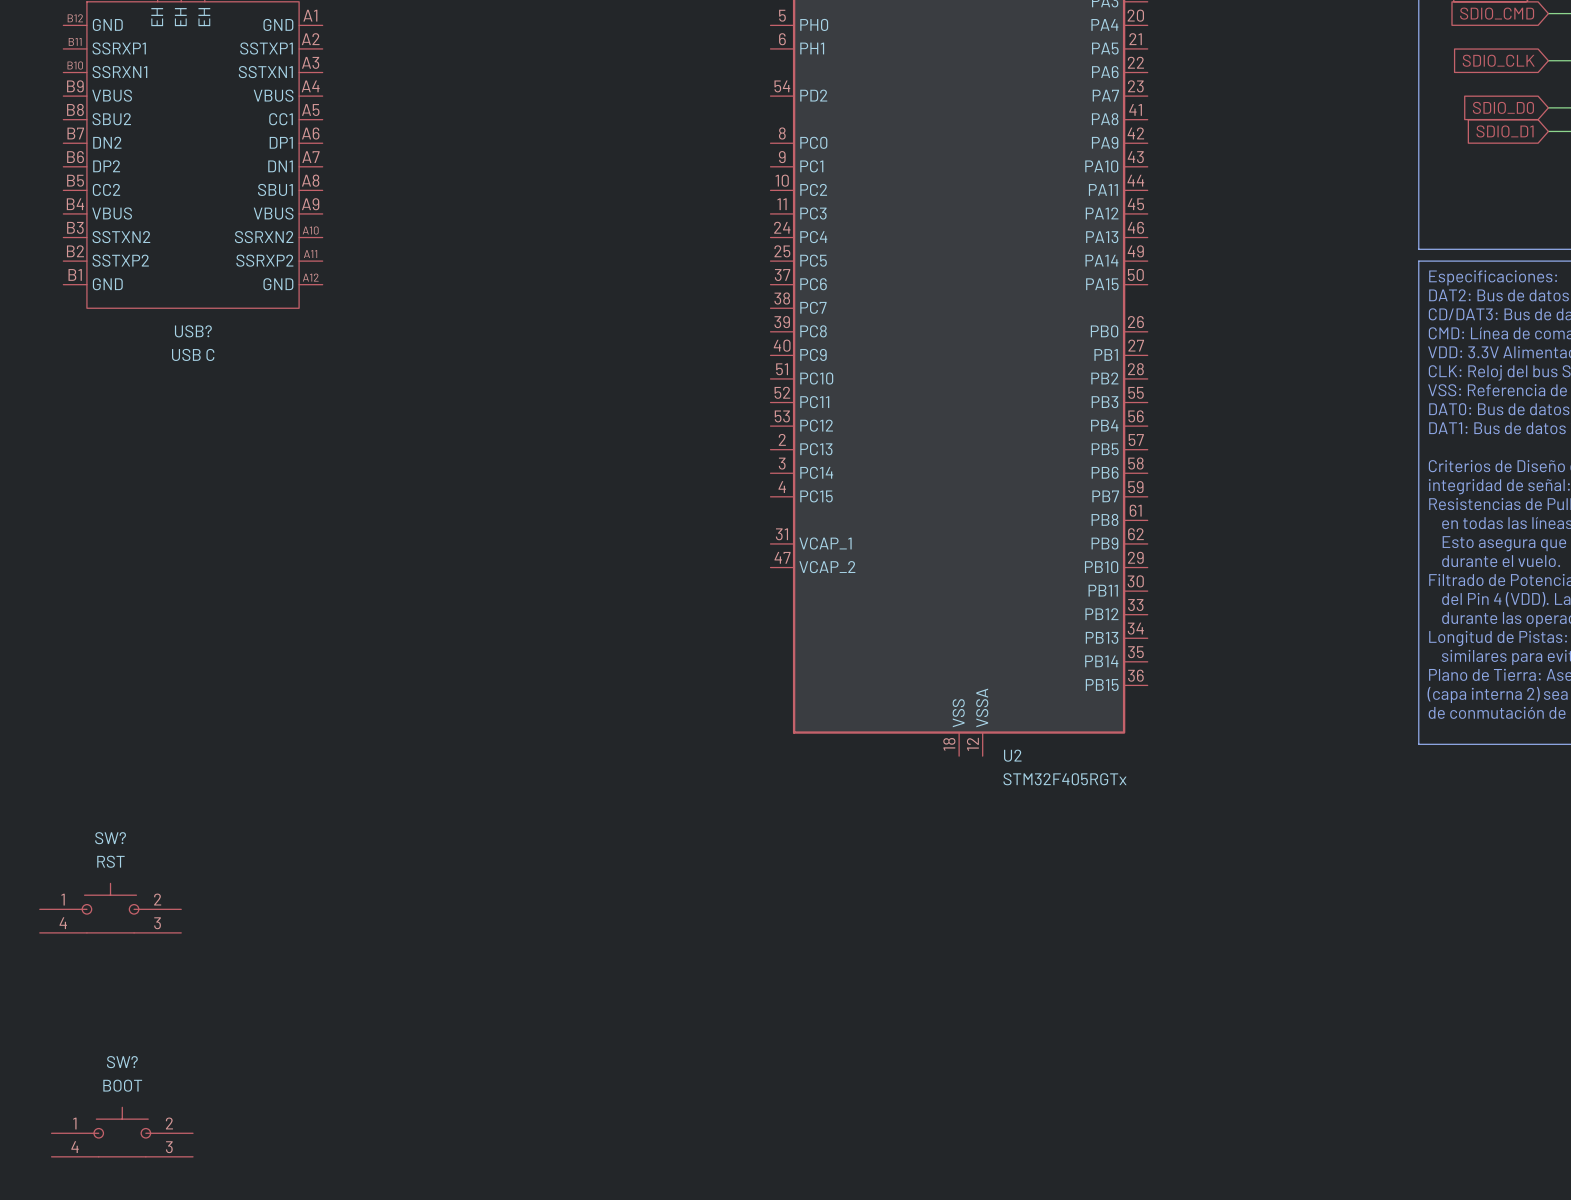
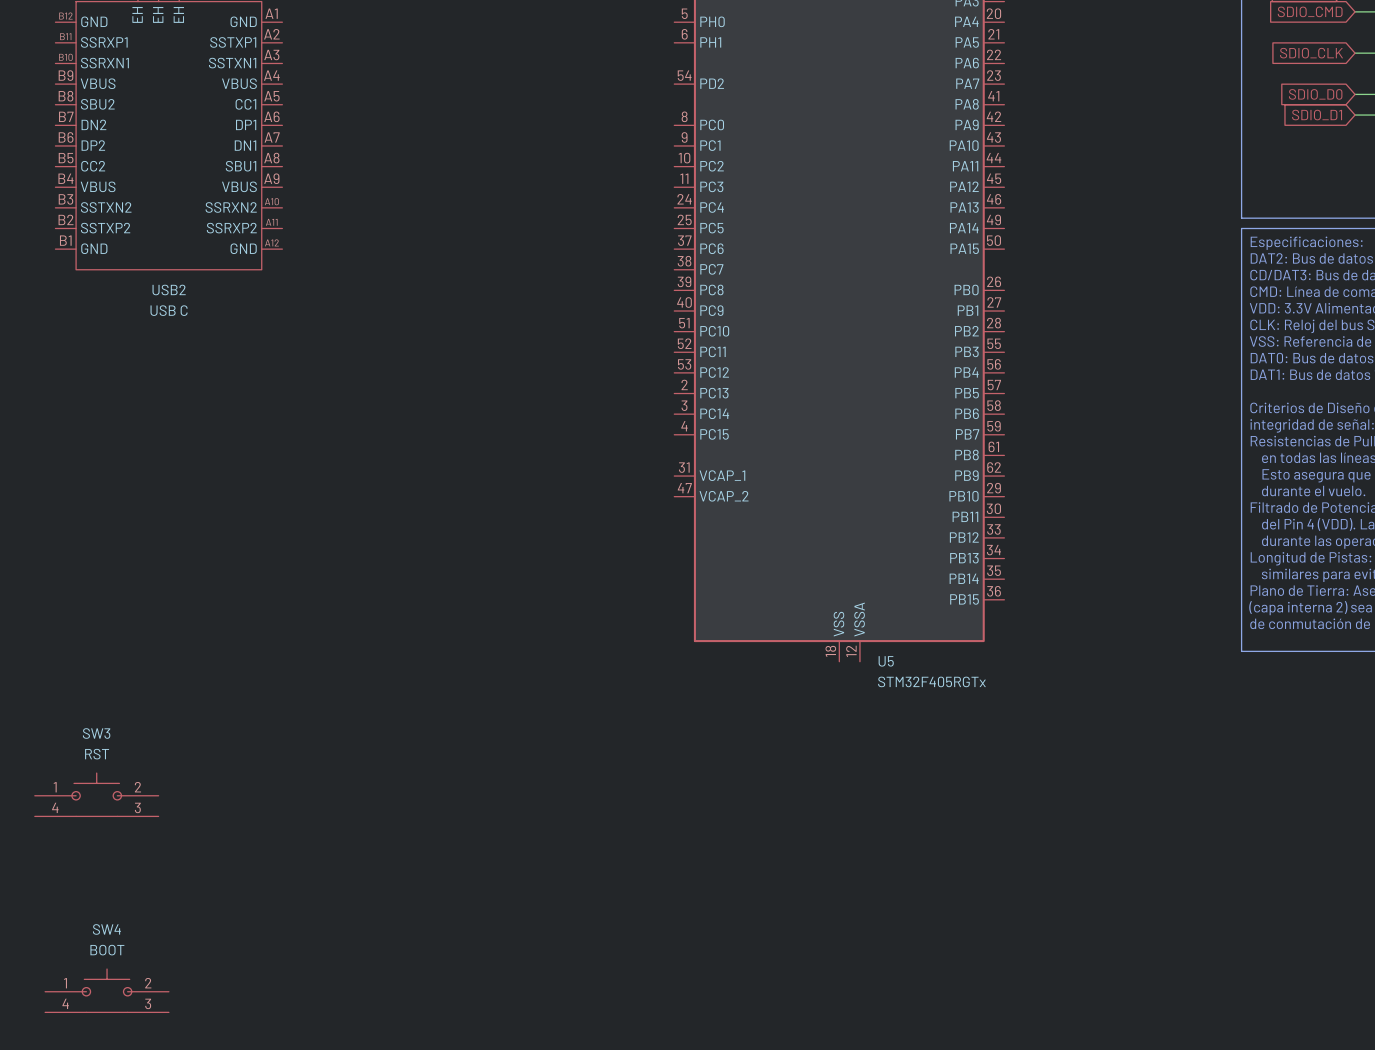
USB? name: USB? (193, 331) -> USB2 (169, 289)
U2 name: U2 (1012, 755) -> U5 (886, 661)
SW? name: SW? (110, 838) -> SW3 (96, 733)
SW? name: SW? (122, 1062) -> SW4 (106, 929)

